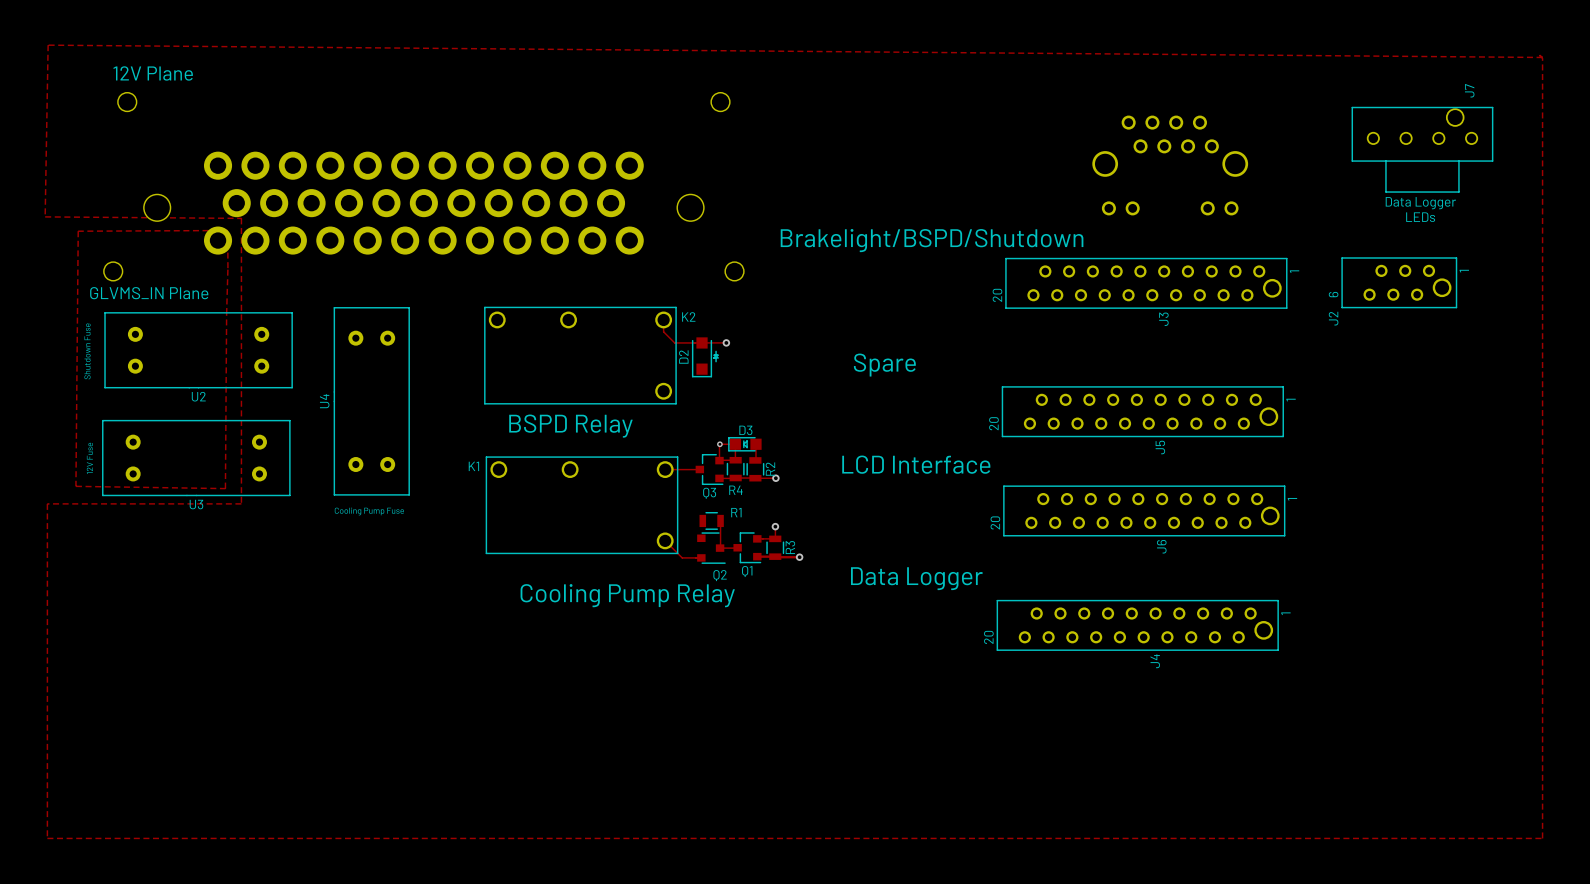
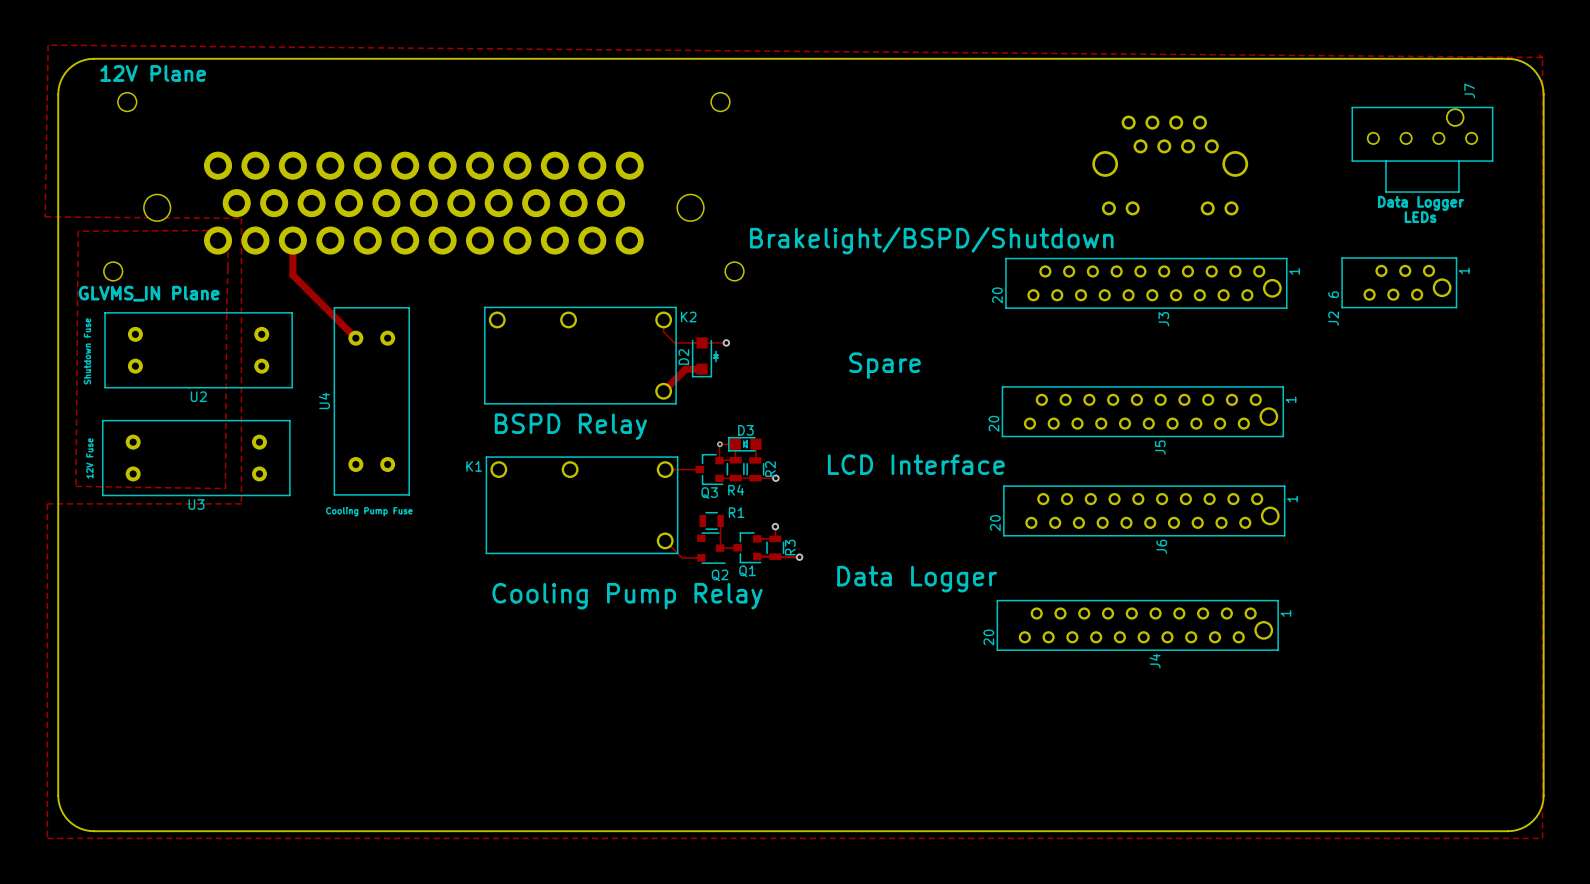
board edge: none -> (93, 58) (1508, 58) (1525, 63) (1538, 76) (1543, 94) (1543, 795) (1538, 813) (1525, 826) (1508, 831) (93, 831) (76, 826) (63, 813) (58, 795) (58, 94) (60, 80) (68, 69) (80, 61) (93, 58)
track: none -> (292, 240) (292, 275) (355, 338)
track: none -> (702, 369) (685, 369) (663, 391)

